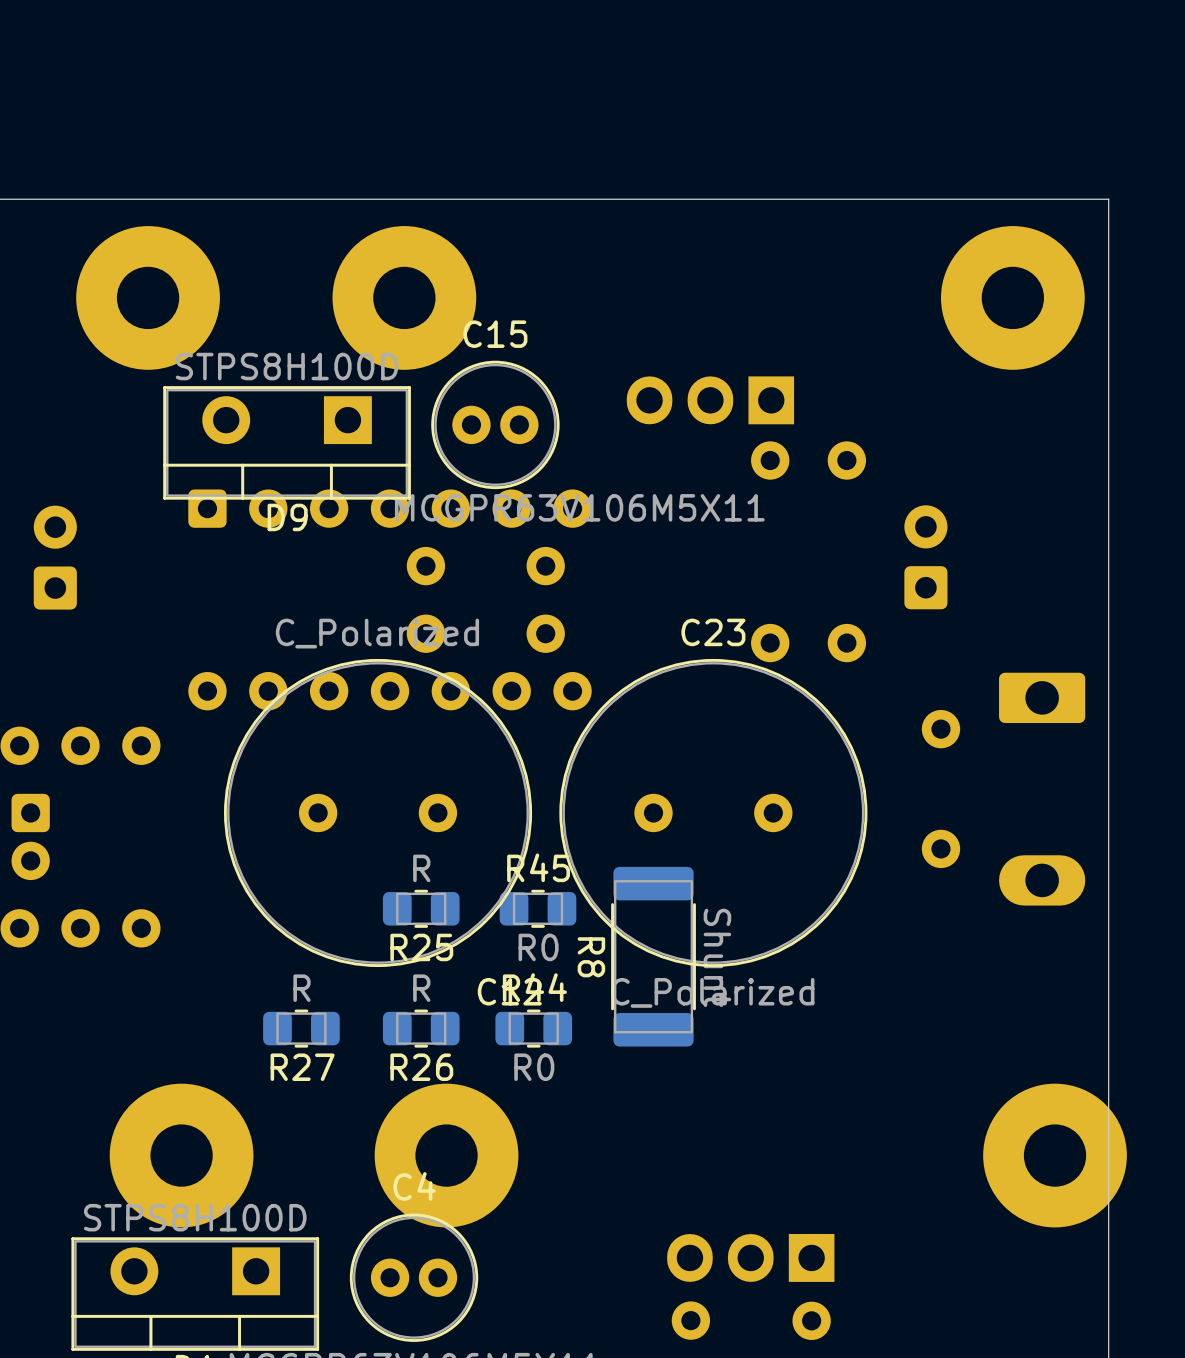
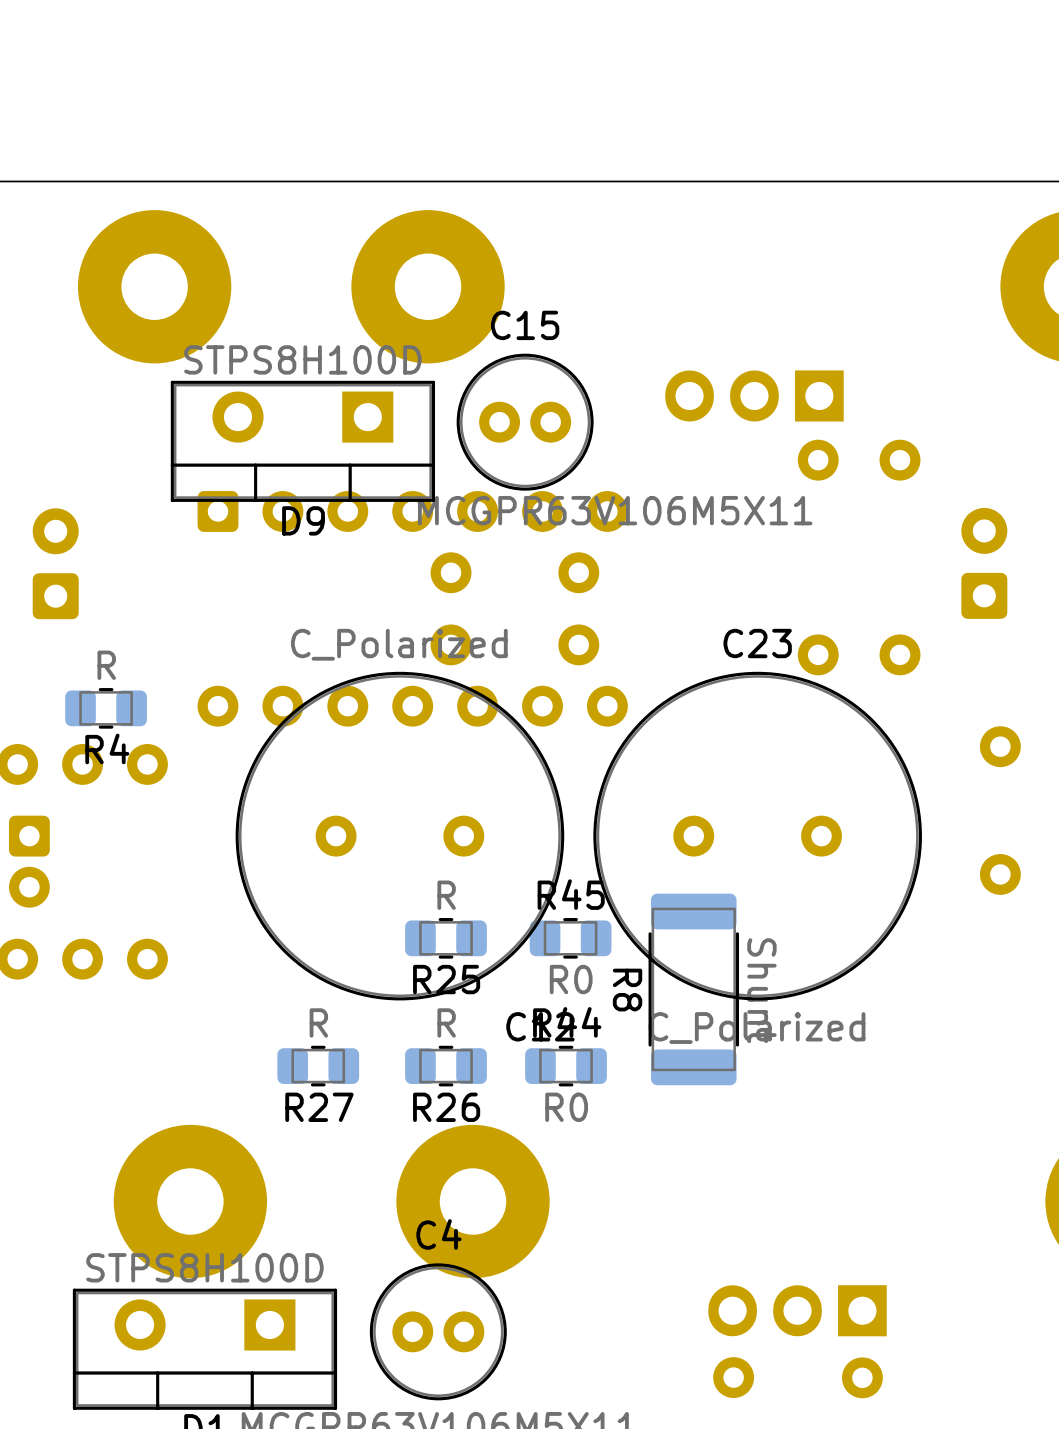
R4: none -> R (106, 708)

